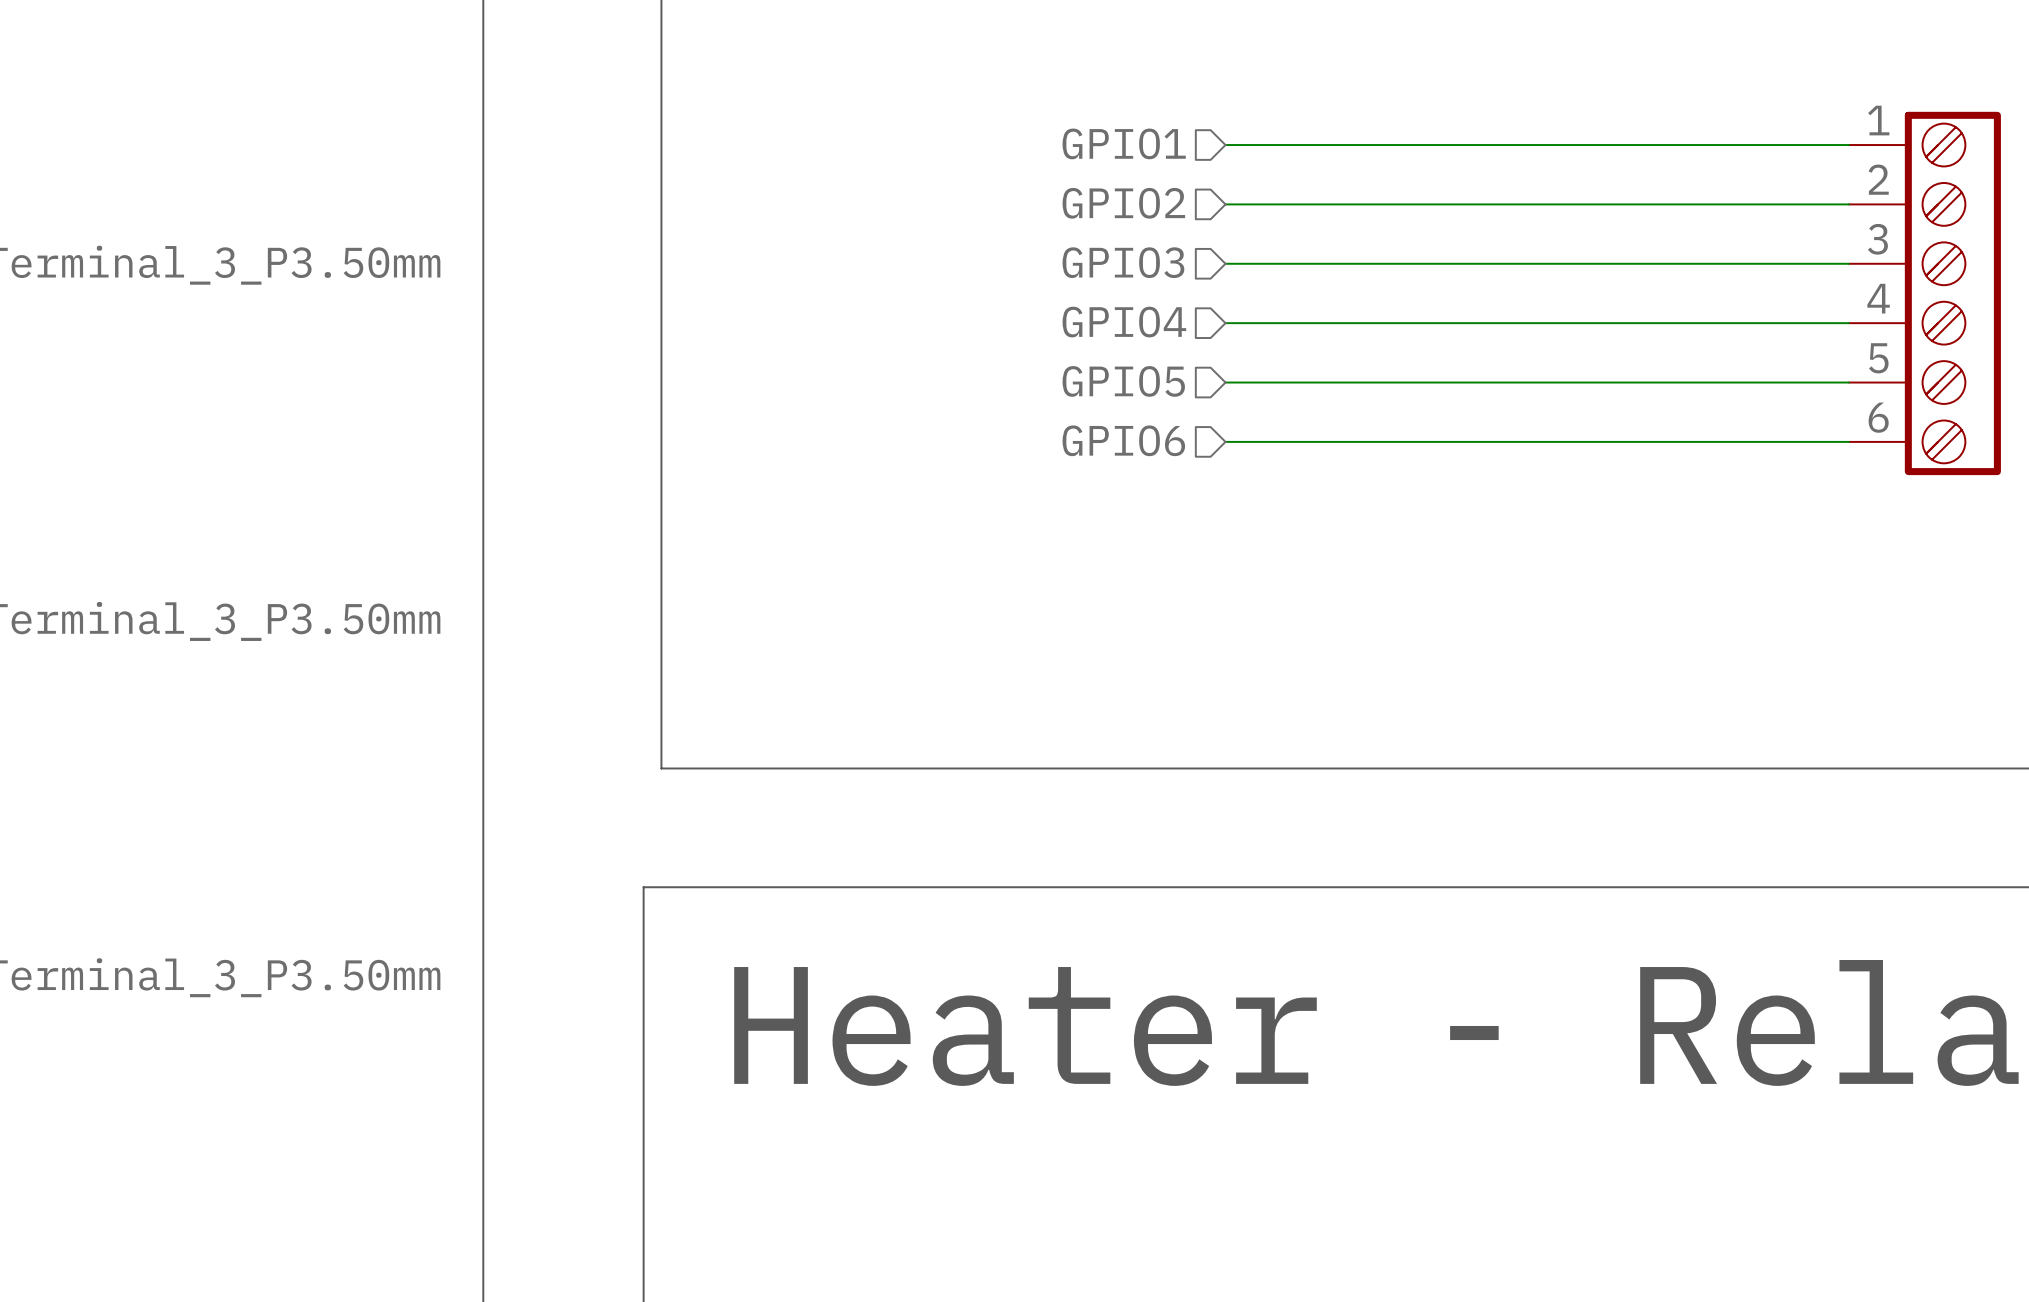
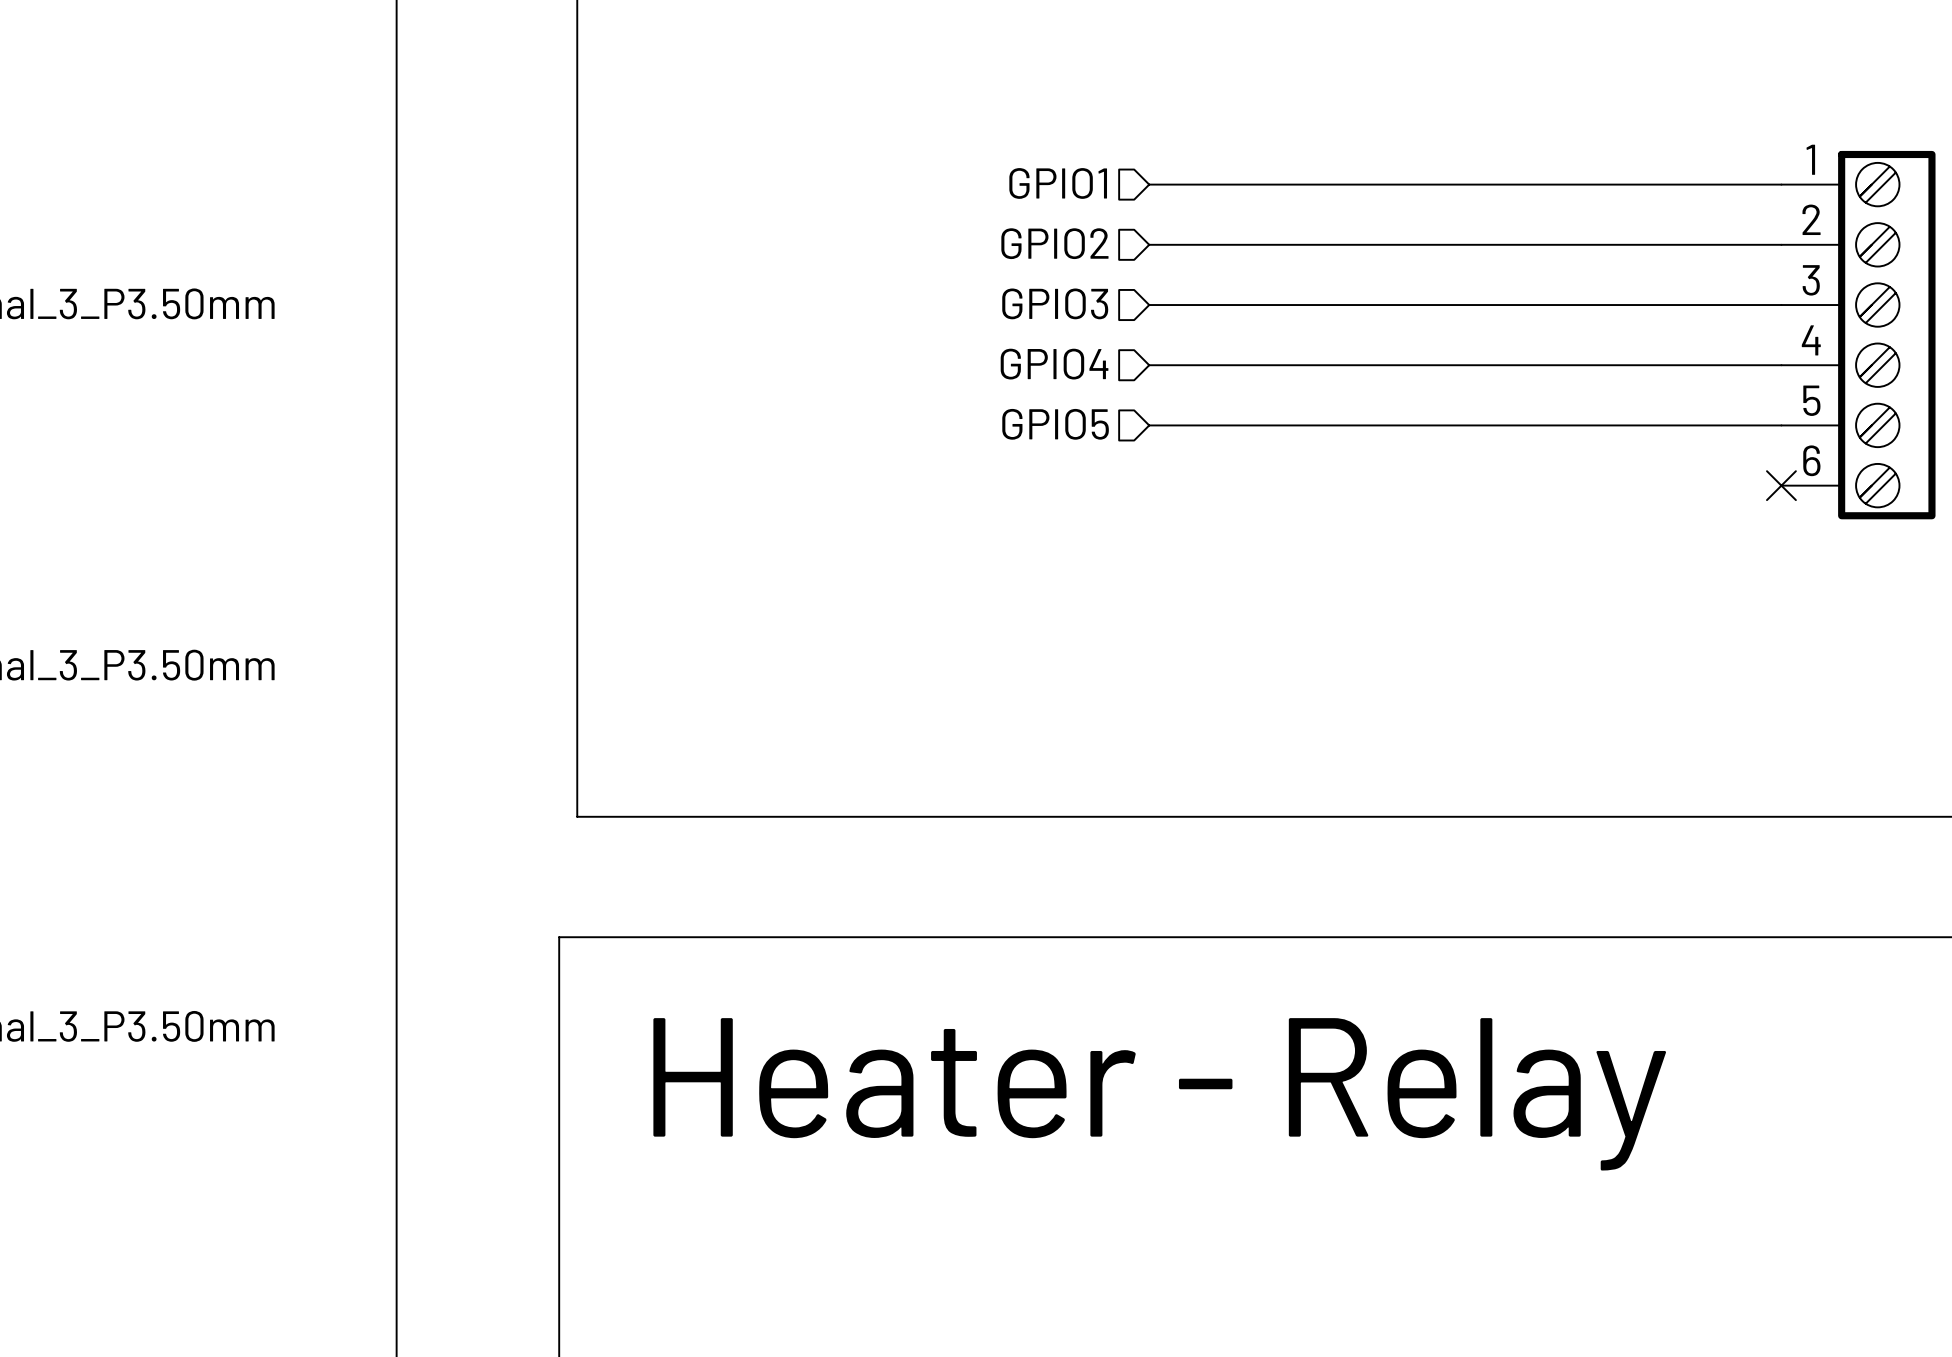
hierarchical label: GPIO6 (1123, 440) -> none
wire: (1225, 441) (1848, 441) -> none
no-connect mark: none -> (1781, 485)

